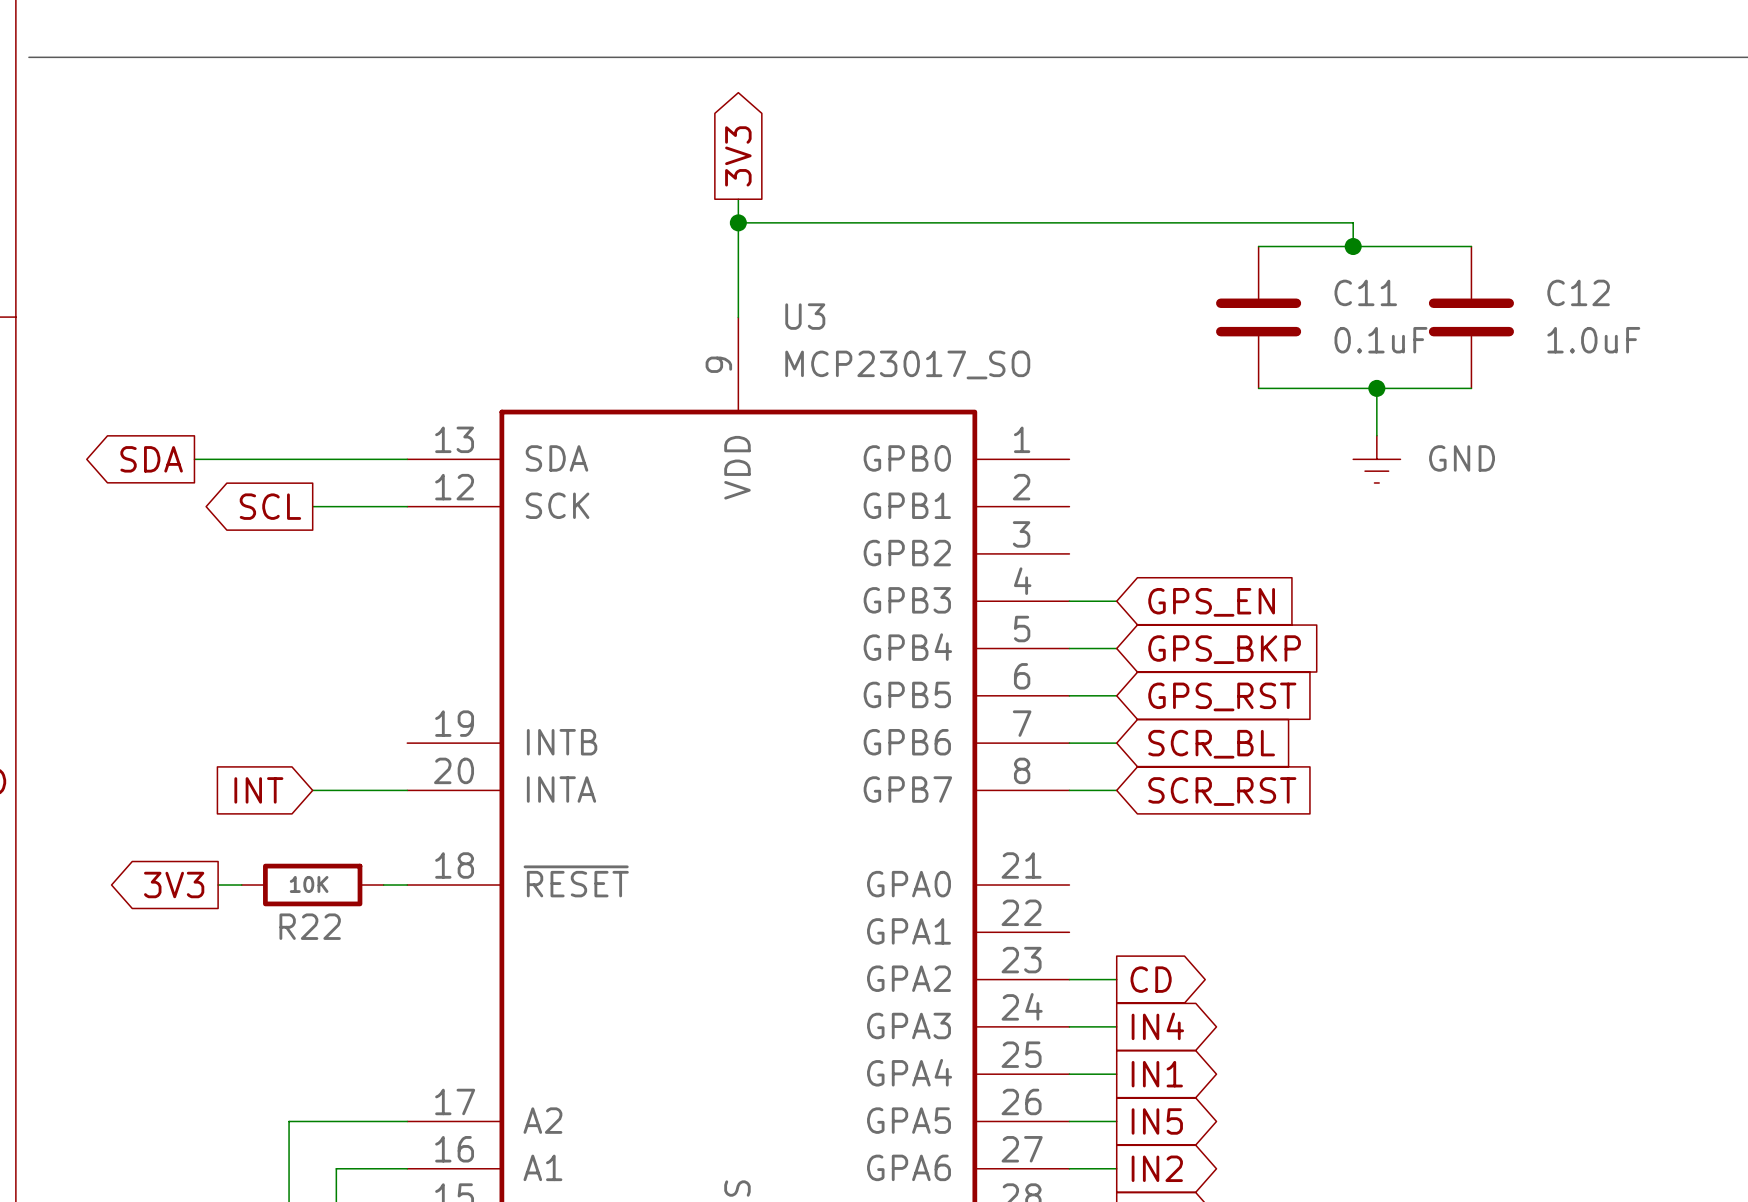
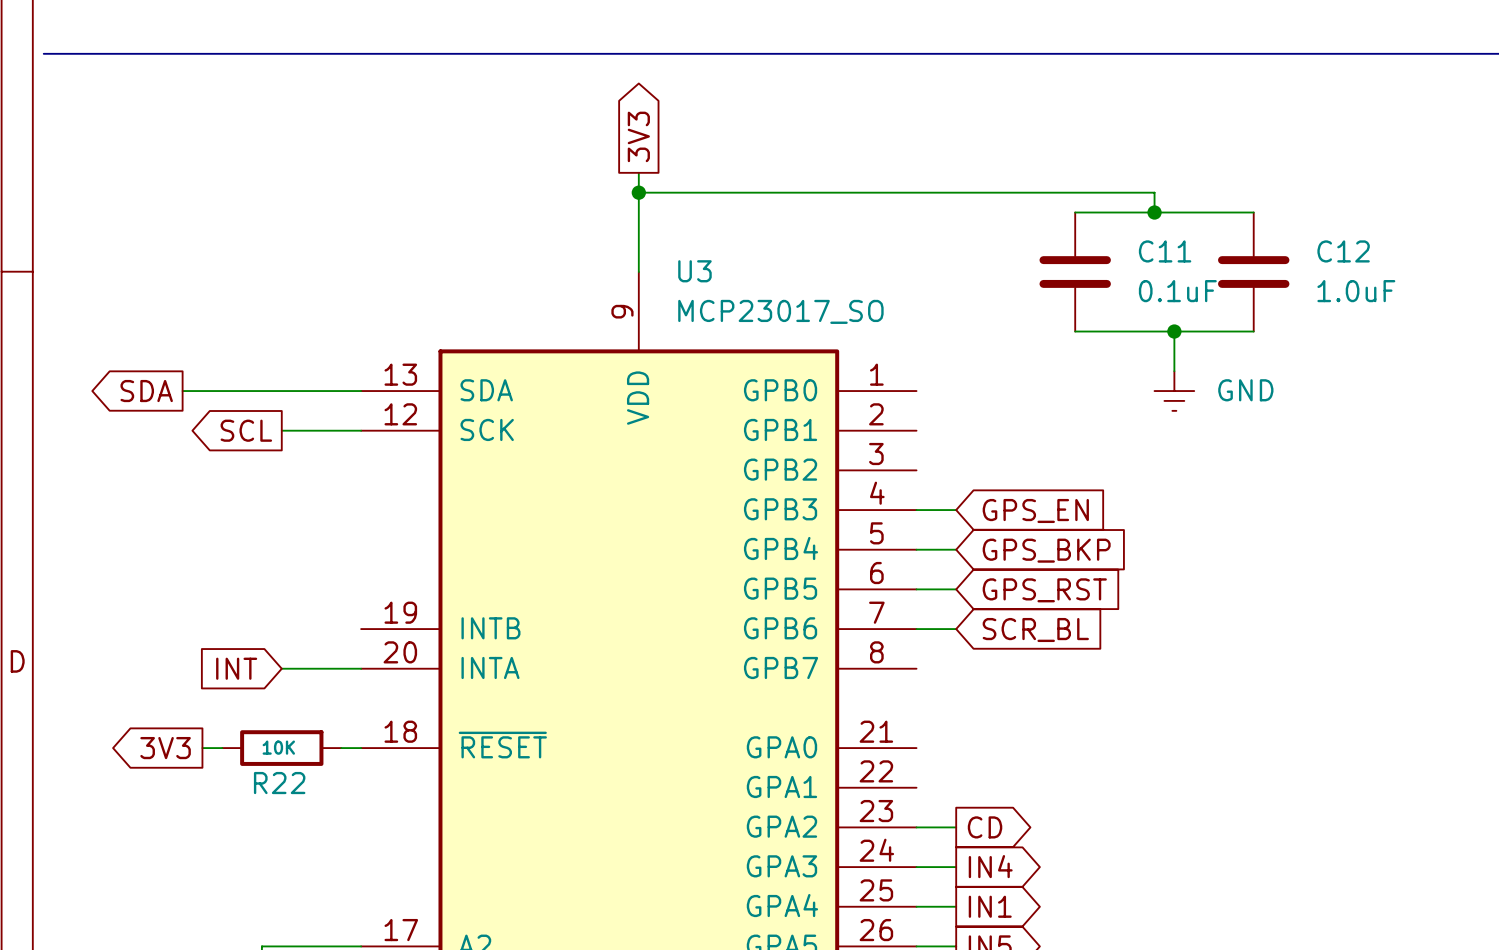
wire: (1069, 790) (1116, 790) -> none
global label: SCR_RST (1222, 791) -> none

